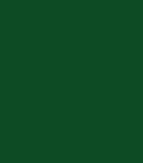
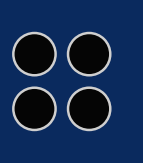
part: none -> (34, 54)
part: none -> (89, 54)
part: none -> (34, 108)
part: none -> (89, 108)

